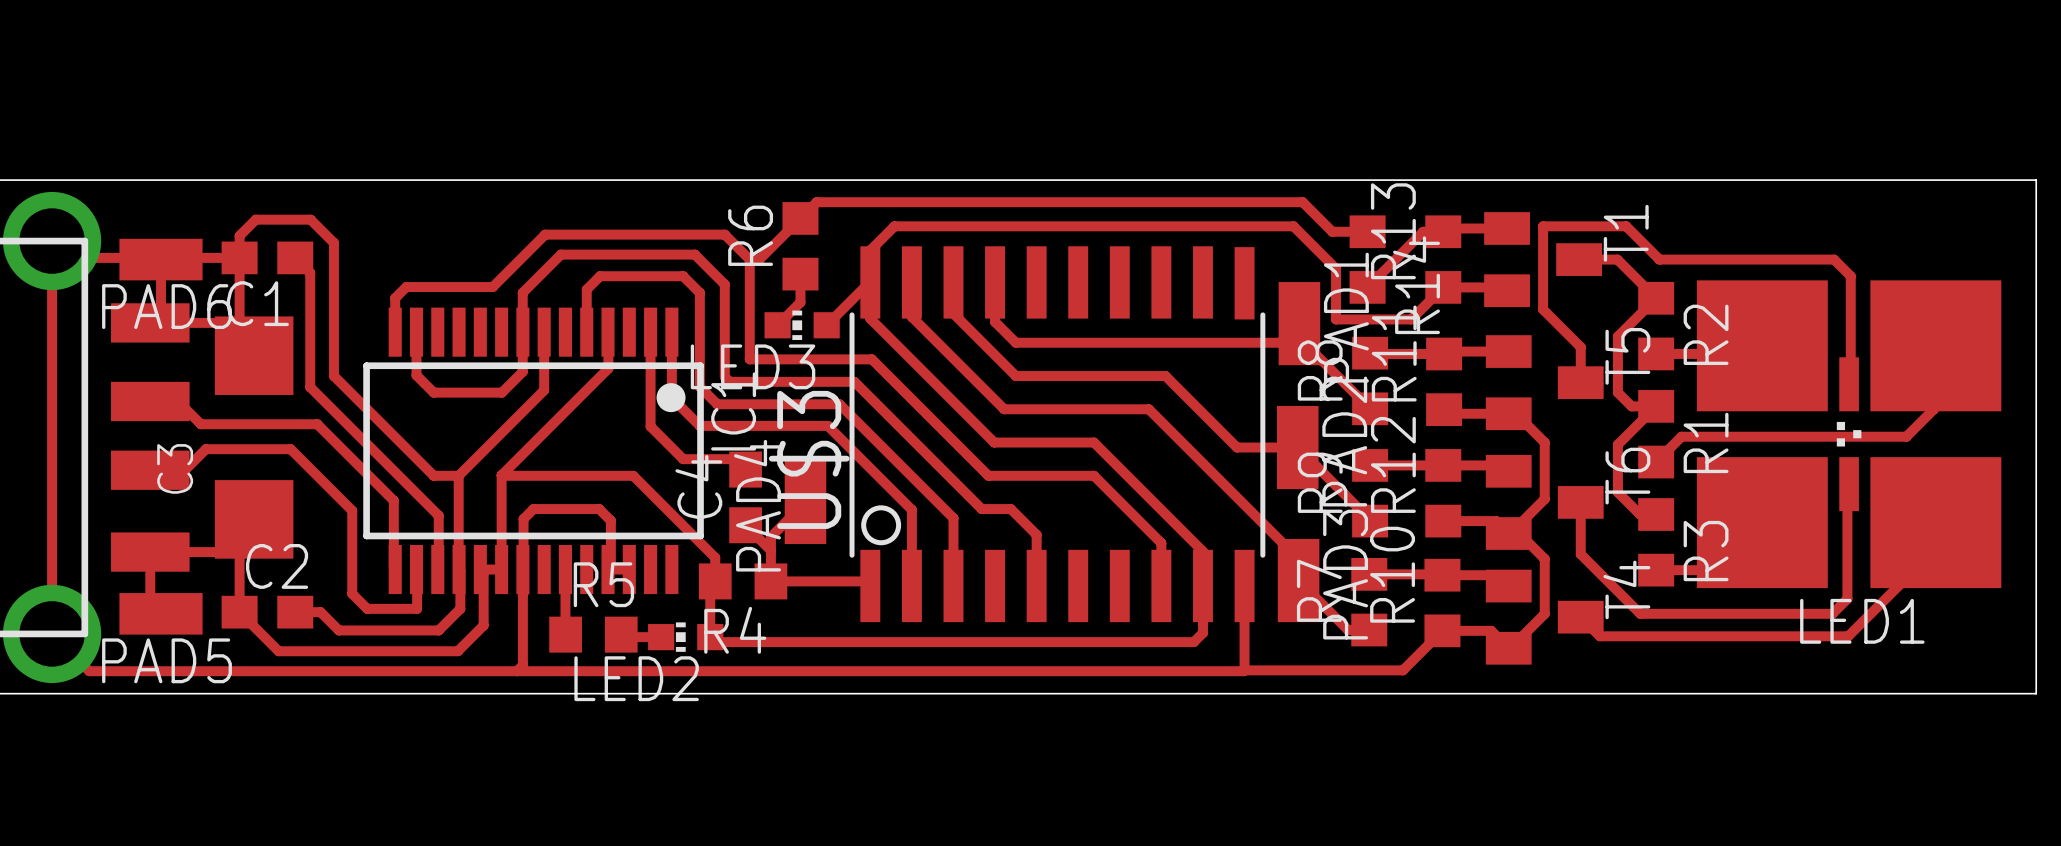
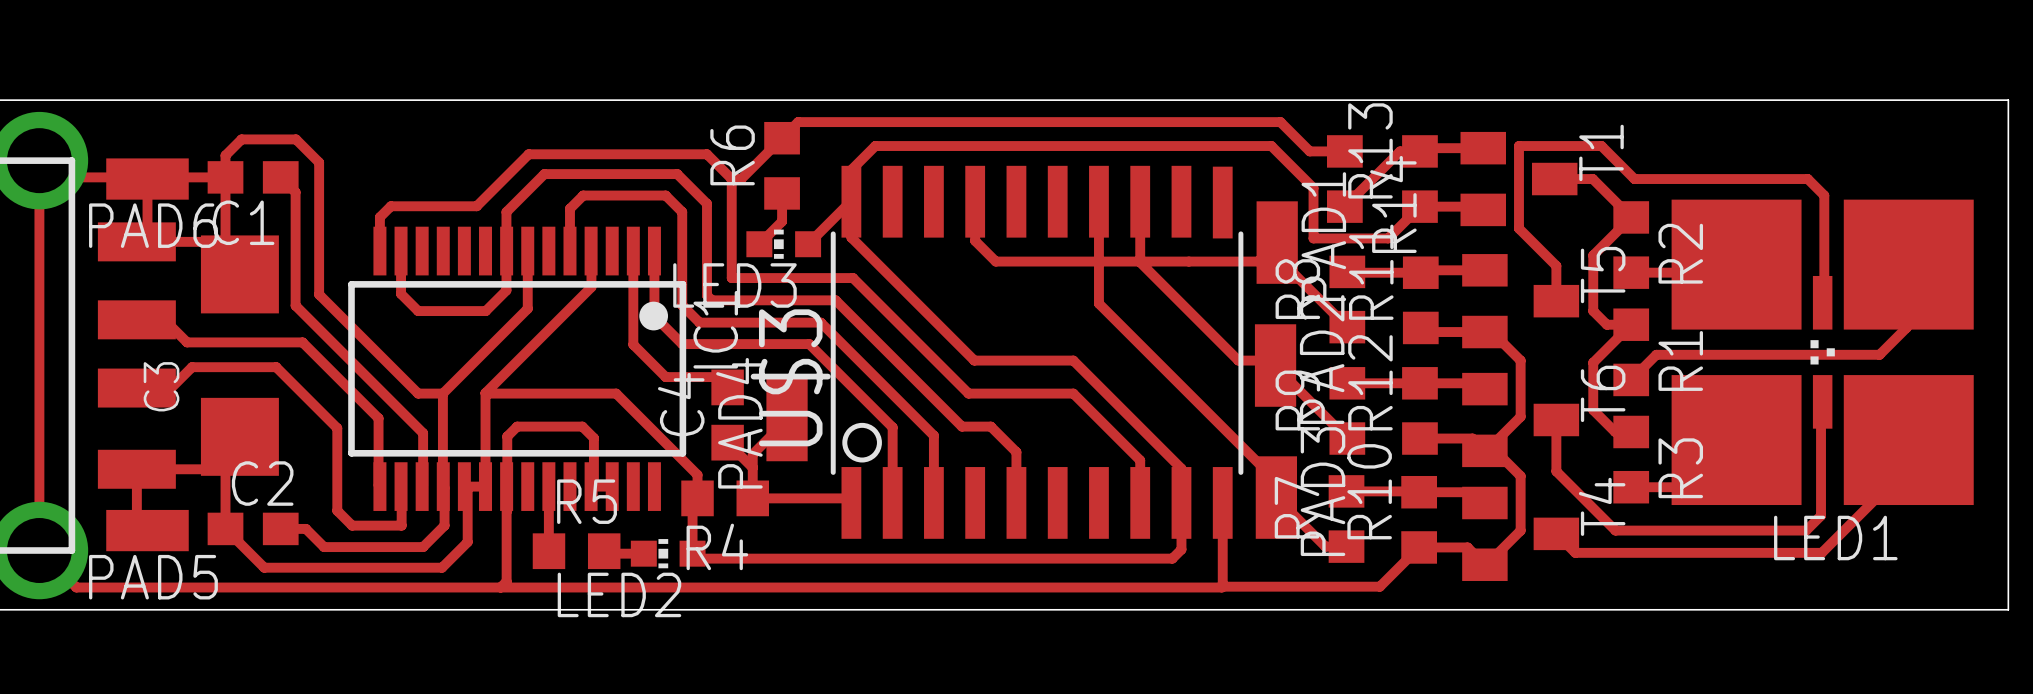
track: (911, 282) (911, 316) (1004, 409) (1148, 409) (1298, 558) (1298, 563) -> (1098, 201) (1098, 303) (1276, 481)
track: (953, 282) (953, 313) (1015, 376) (1165, 376) (1237, 447) (1297, 447) (1370, 521) -> (1140, 201) (1140, 262) (1238, 360) (1270, 360) (1275, 365) (1275, 379) (1287, 379) (1347, 438)

